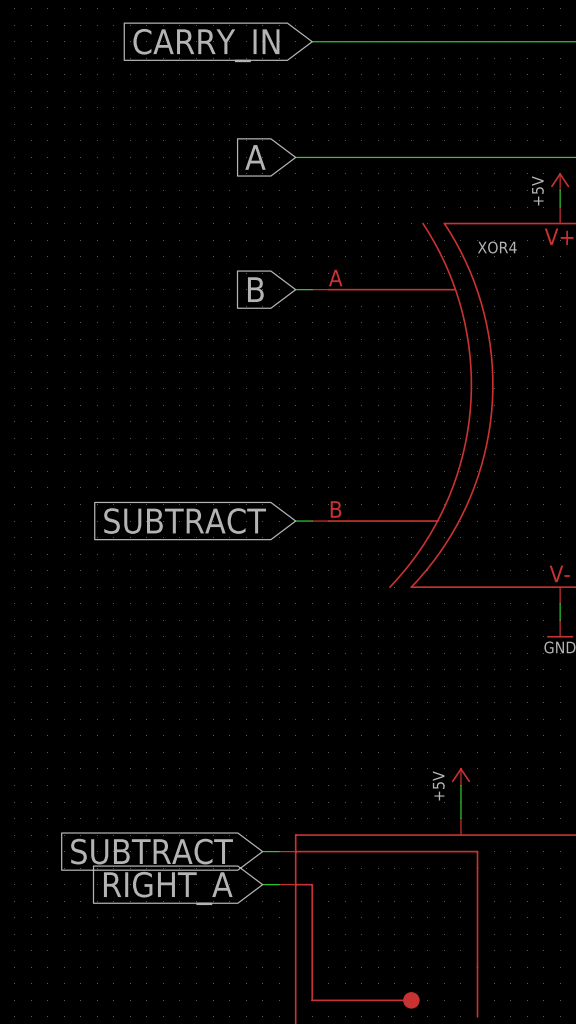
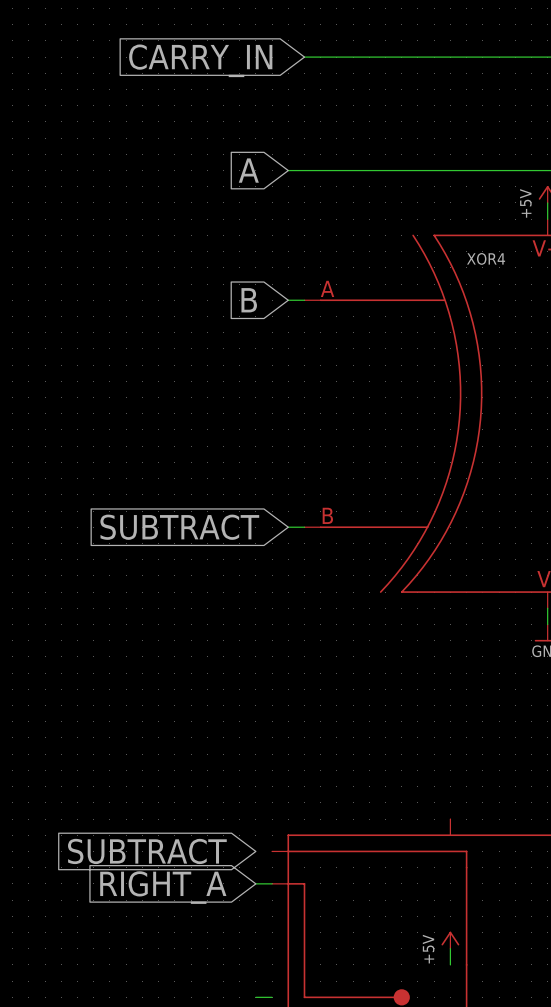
power symbol: +5V (460, 776) -> none
wire: (460, 785) (460, 818) -> none
wire: (262, 851) (279, 851) -> (255, 997) (272, 997)
power symbol: none -> +5V (450, 940)
wire: none -> (450, 948) (450, 964)

